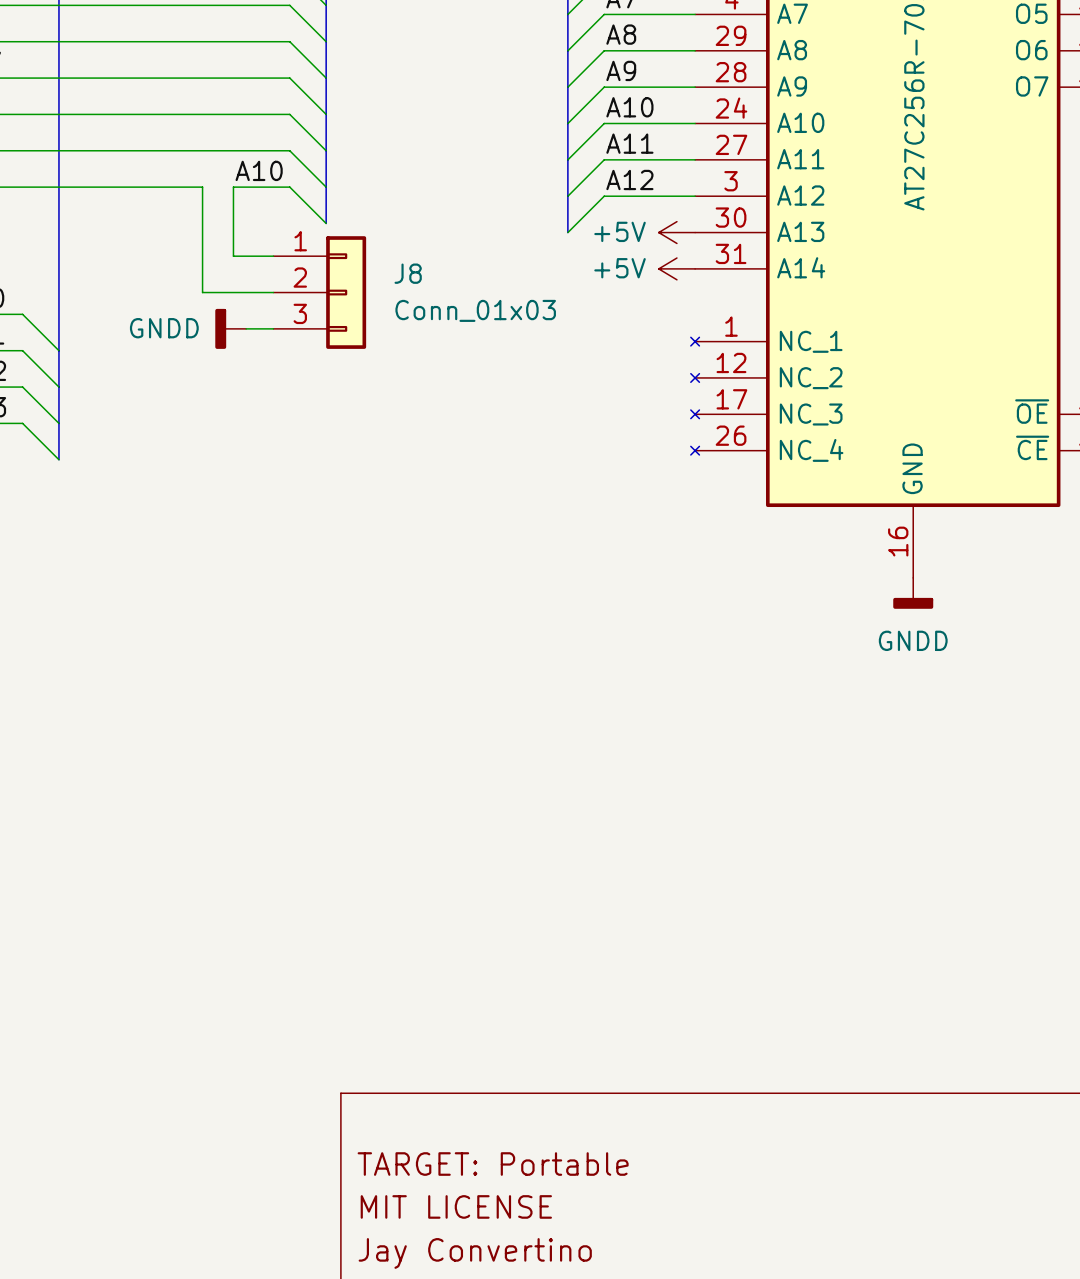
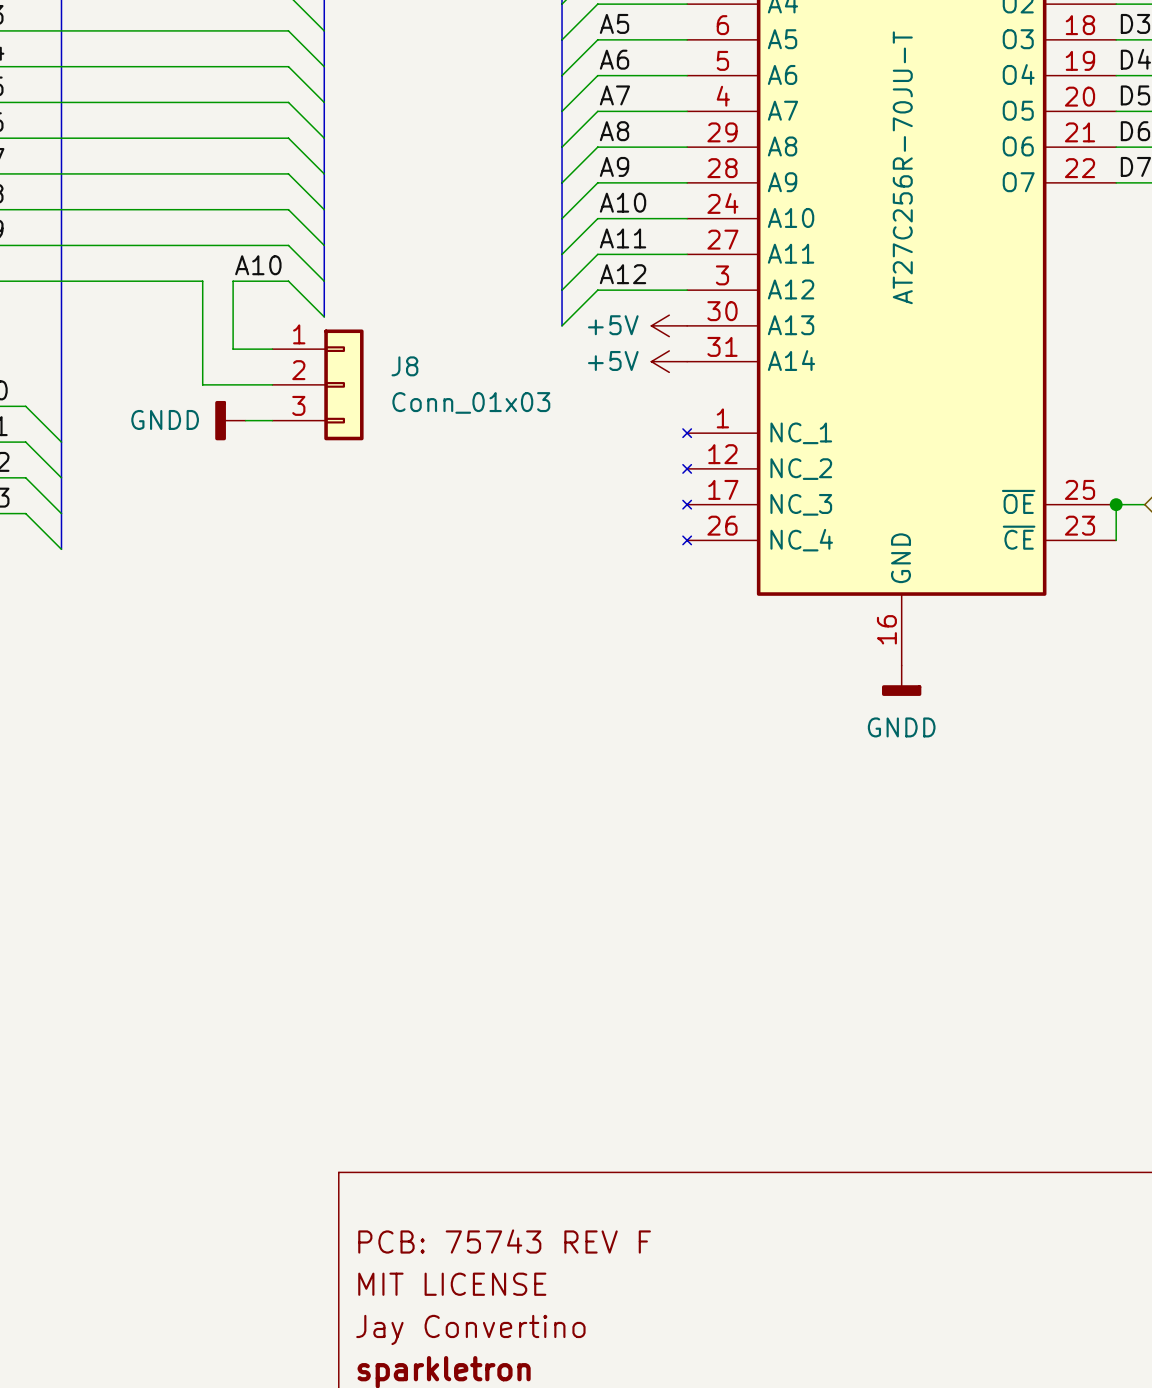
title block: TARGET: Portable (493, 1164) -> PCB: 75743 REV F (504, 1241)

